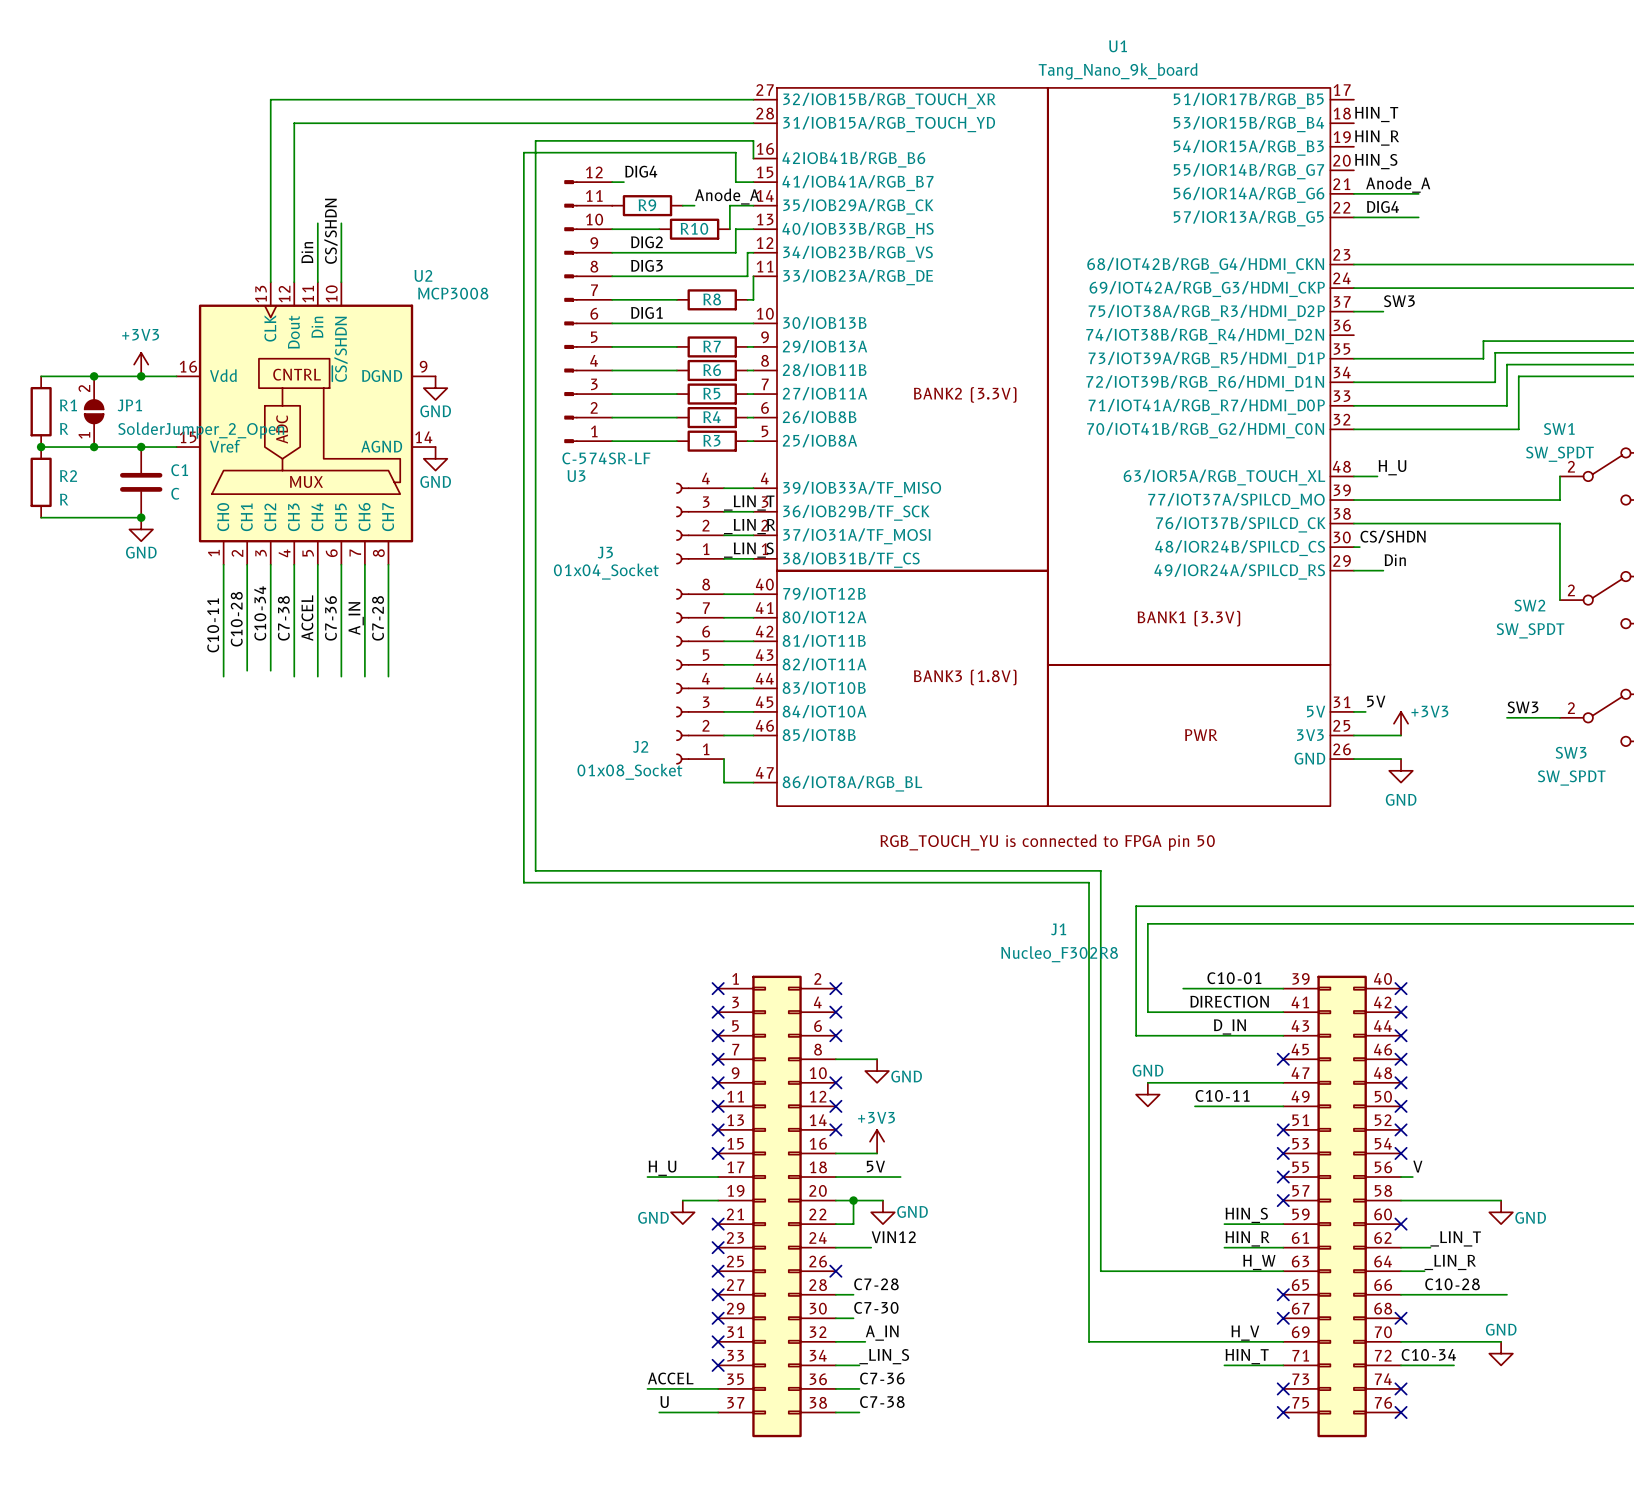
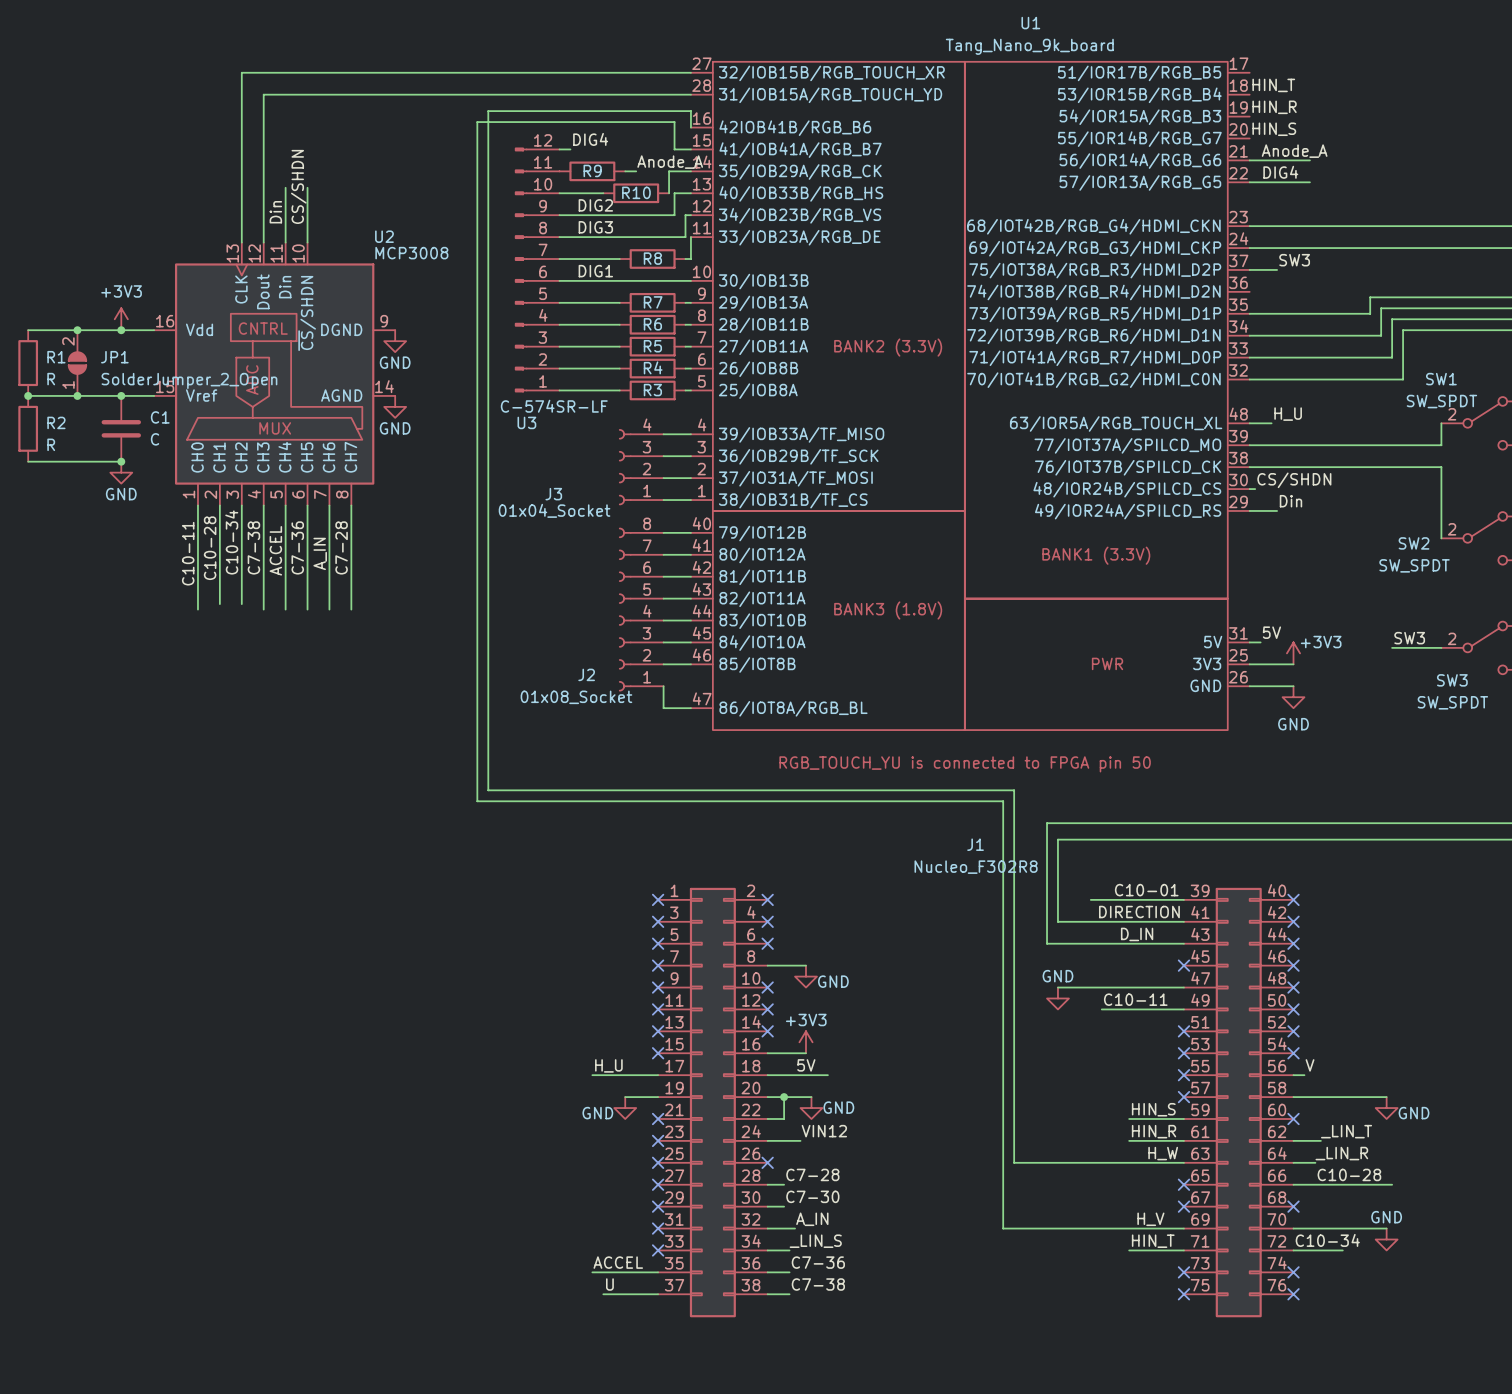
label: _LIN_T (749, 503) -> none
label: _LIN_R (749, 526) -> none
label: _LIN_S (748, 550) -> none

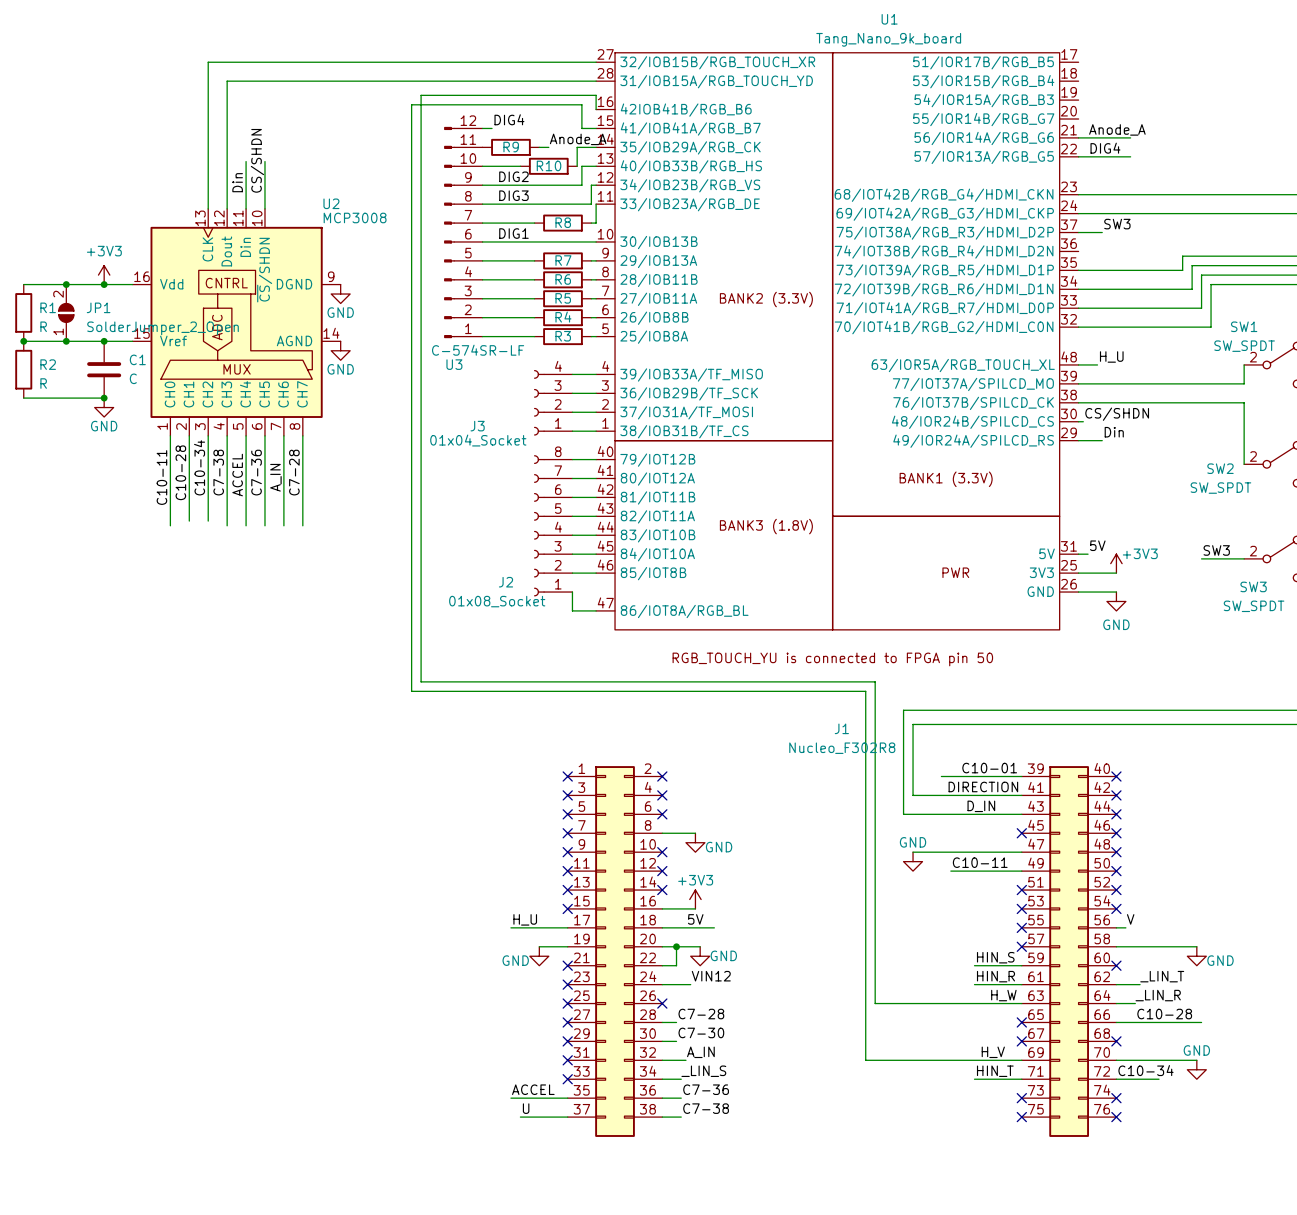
label: HIN_T (1273, 85) -> none
label: HIN_R (1274, 107) -> none
label: HIN_S (1274, 129) -> none

